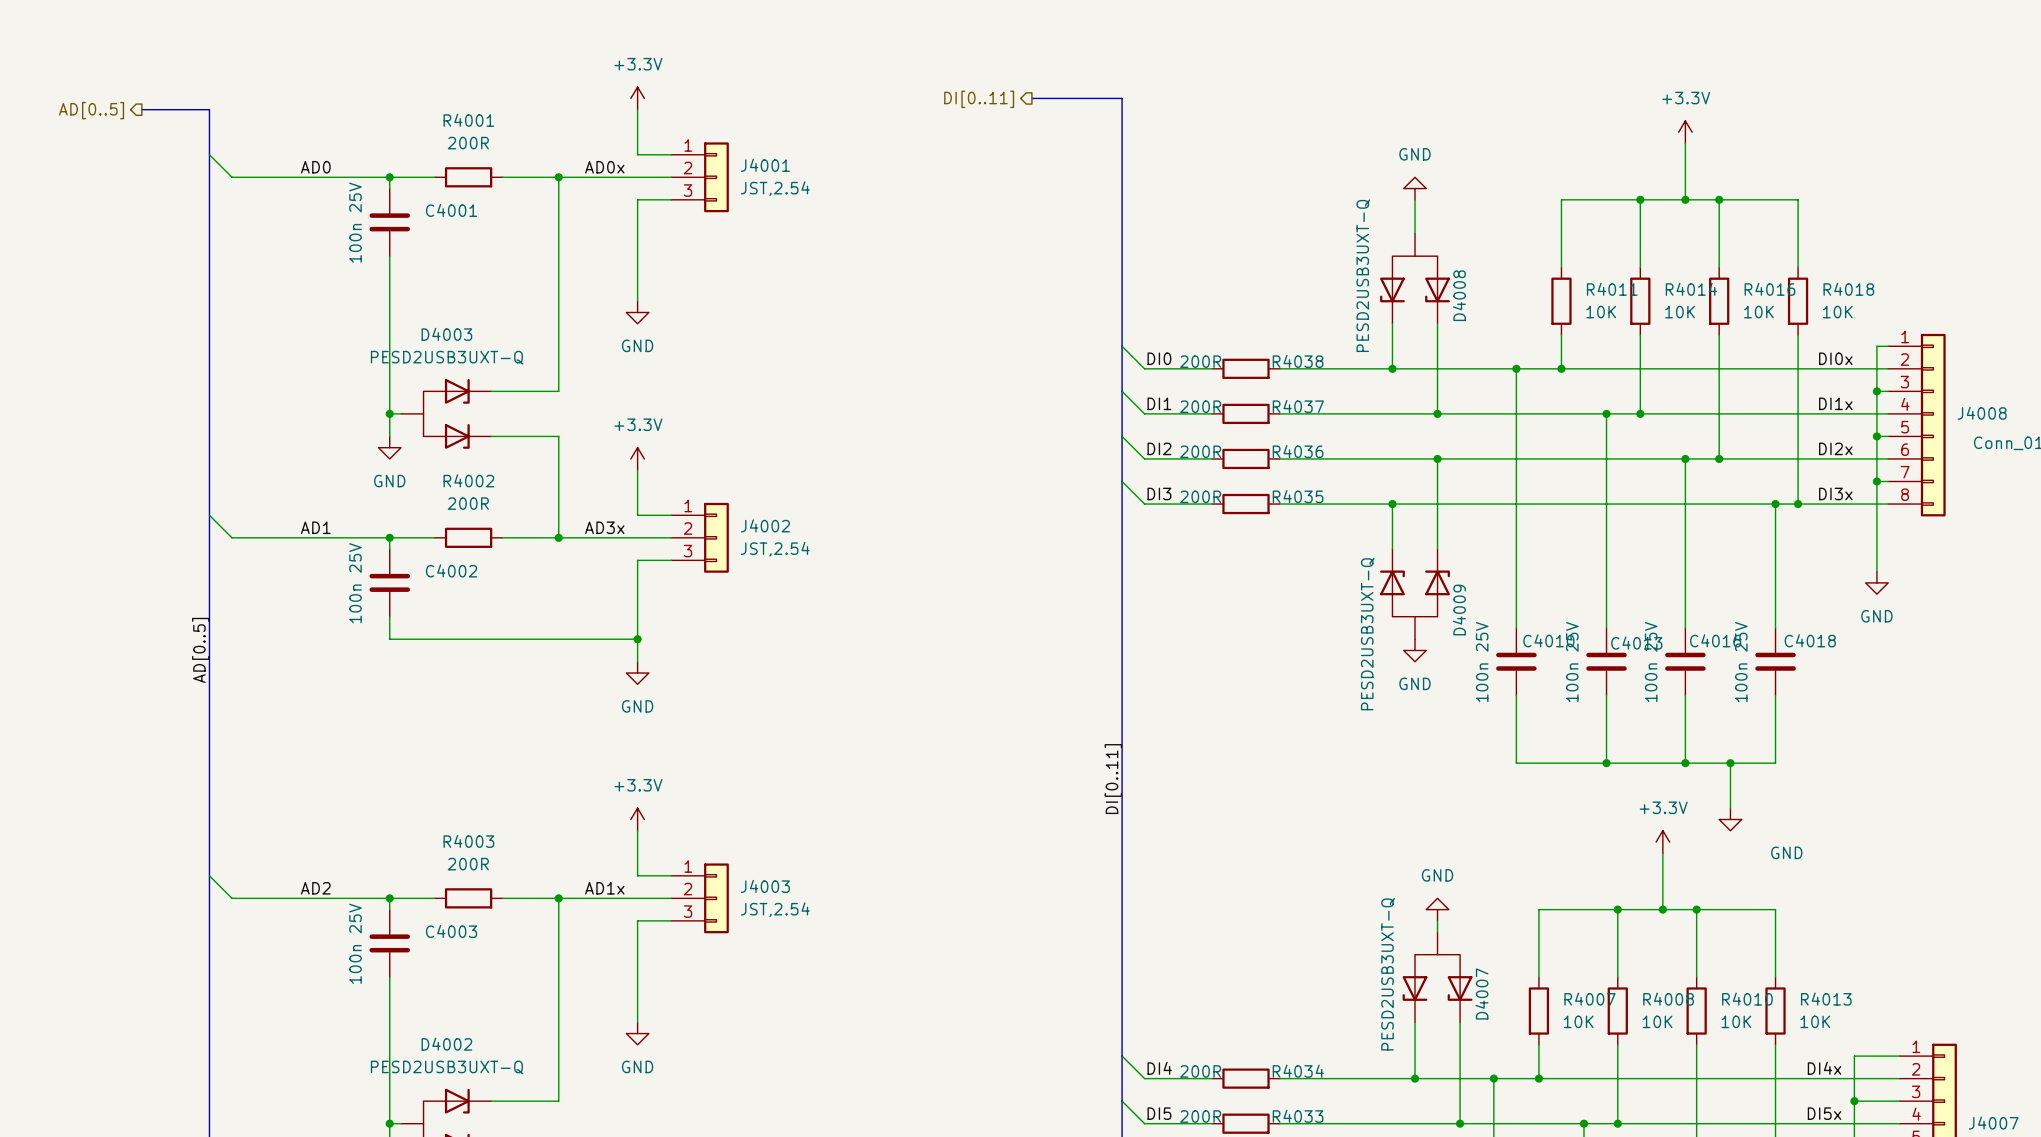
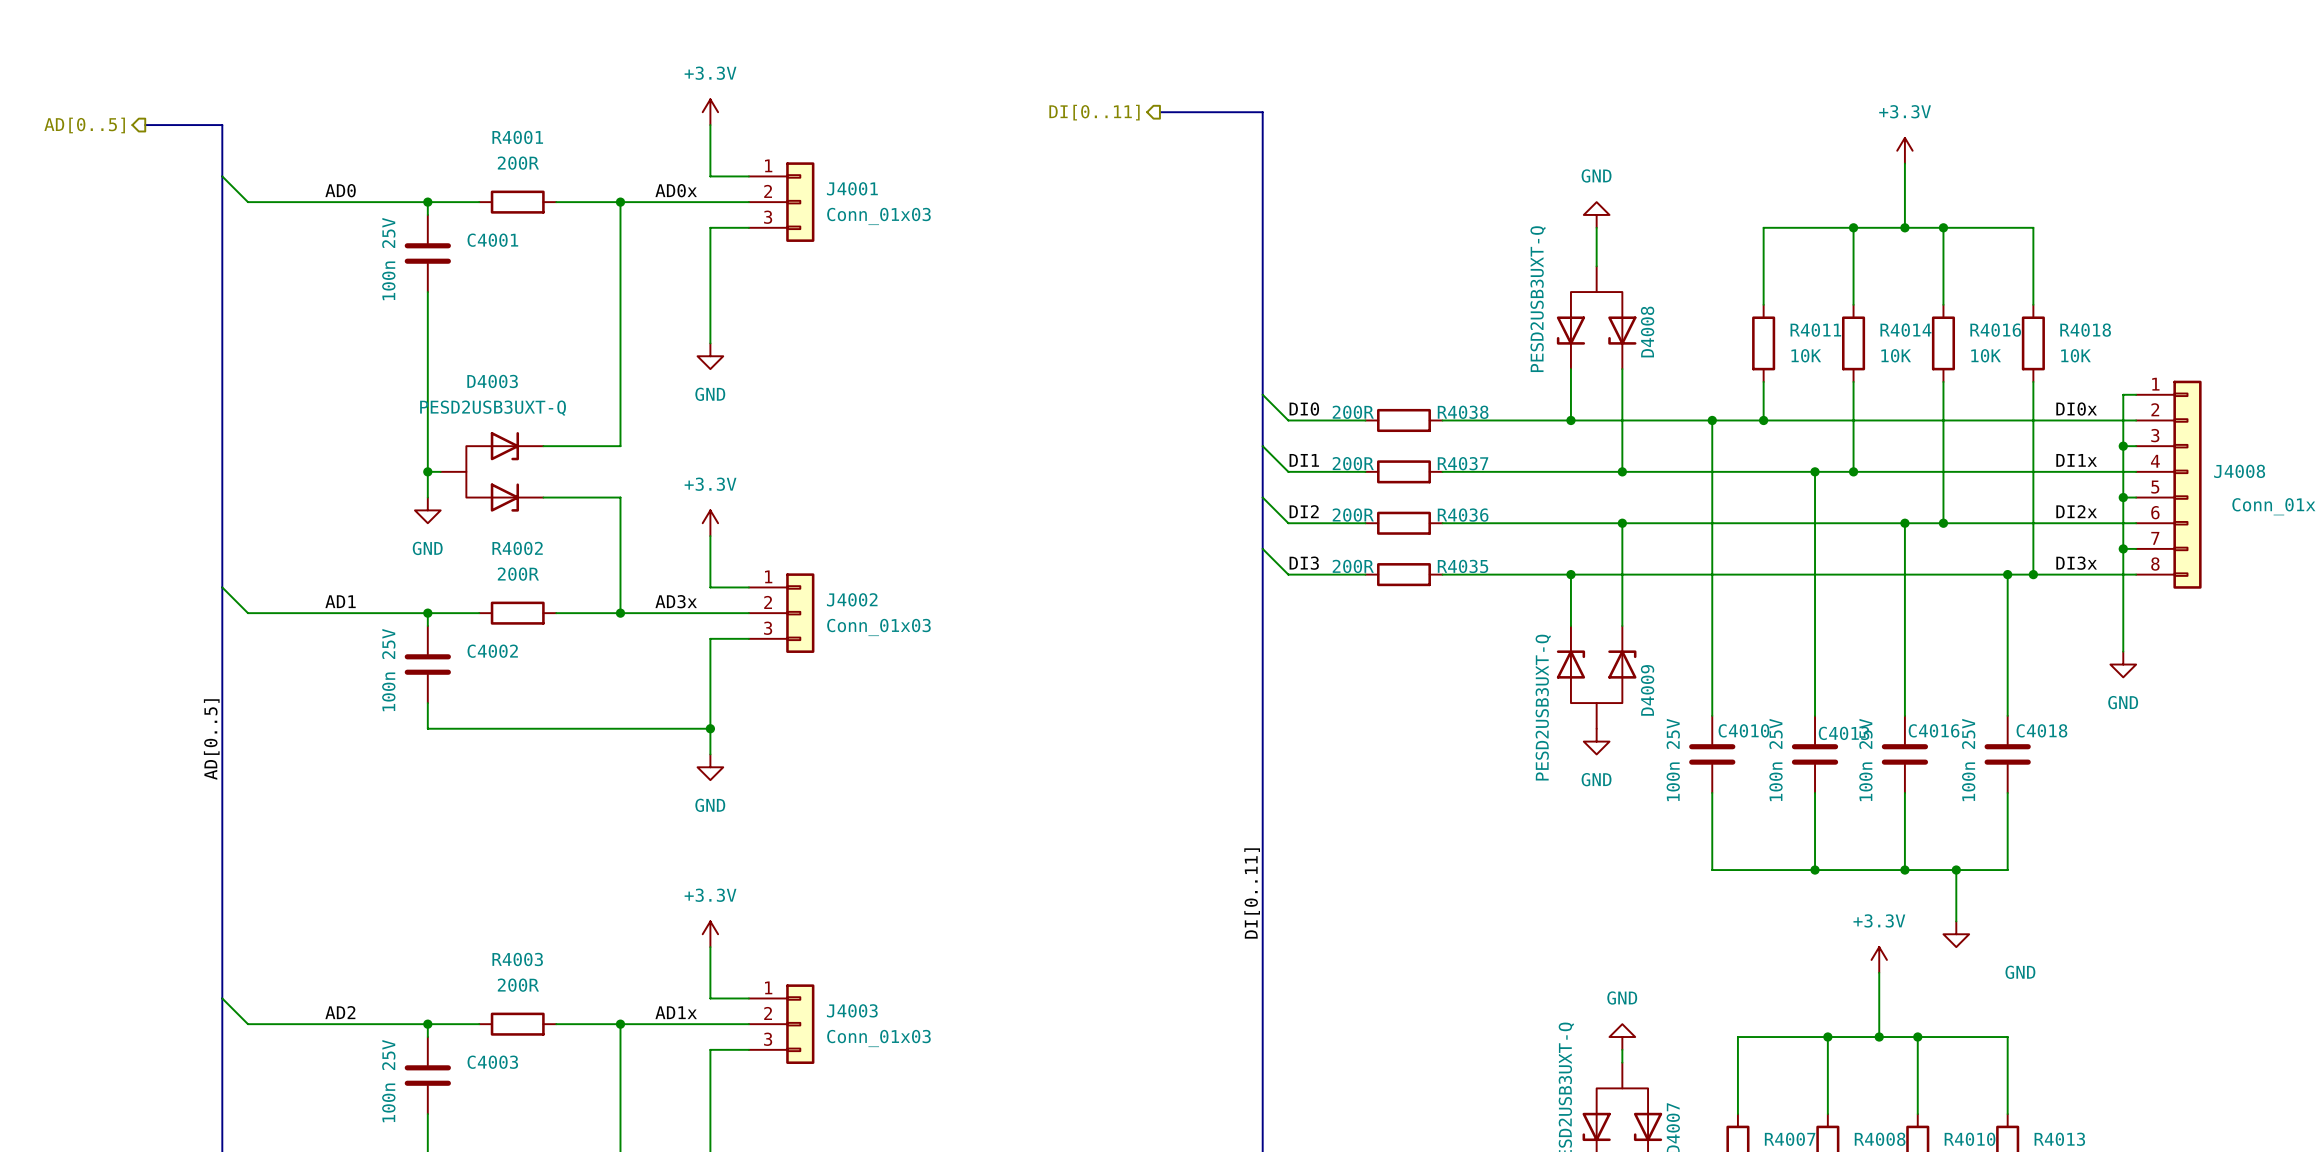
J4001 value: JST,2.54 (775, 188) -> Conn_01x03 (878, 216)
J4002 value: JST,2.54 (775, 549) -> Conn_01x03 (878, 627)
J4003 value: JST,2.54 (775, 909) -> Conn_01x03 (878, 1038)

